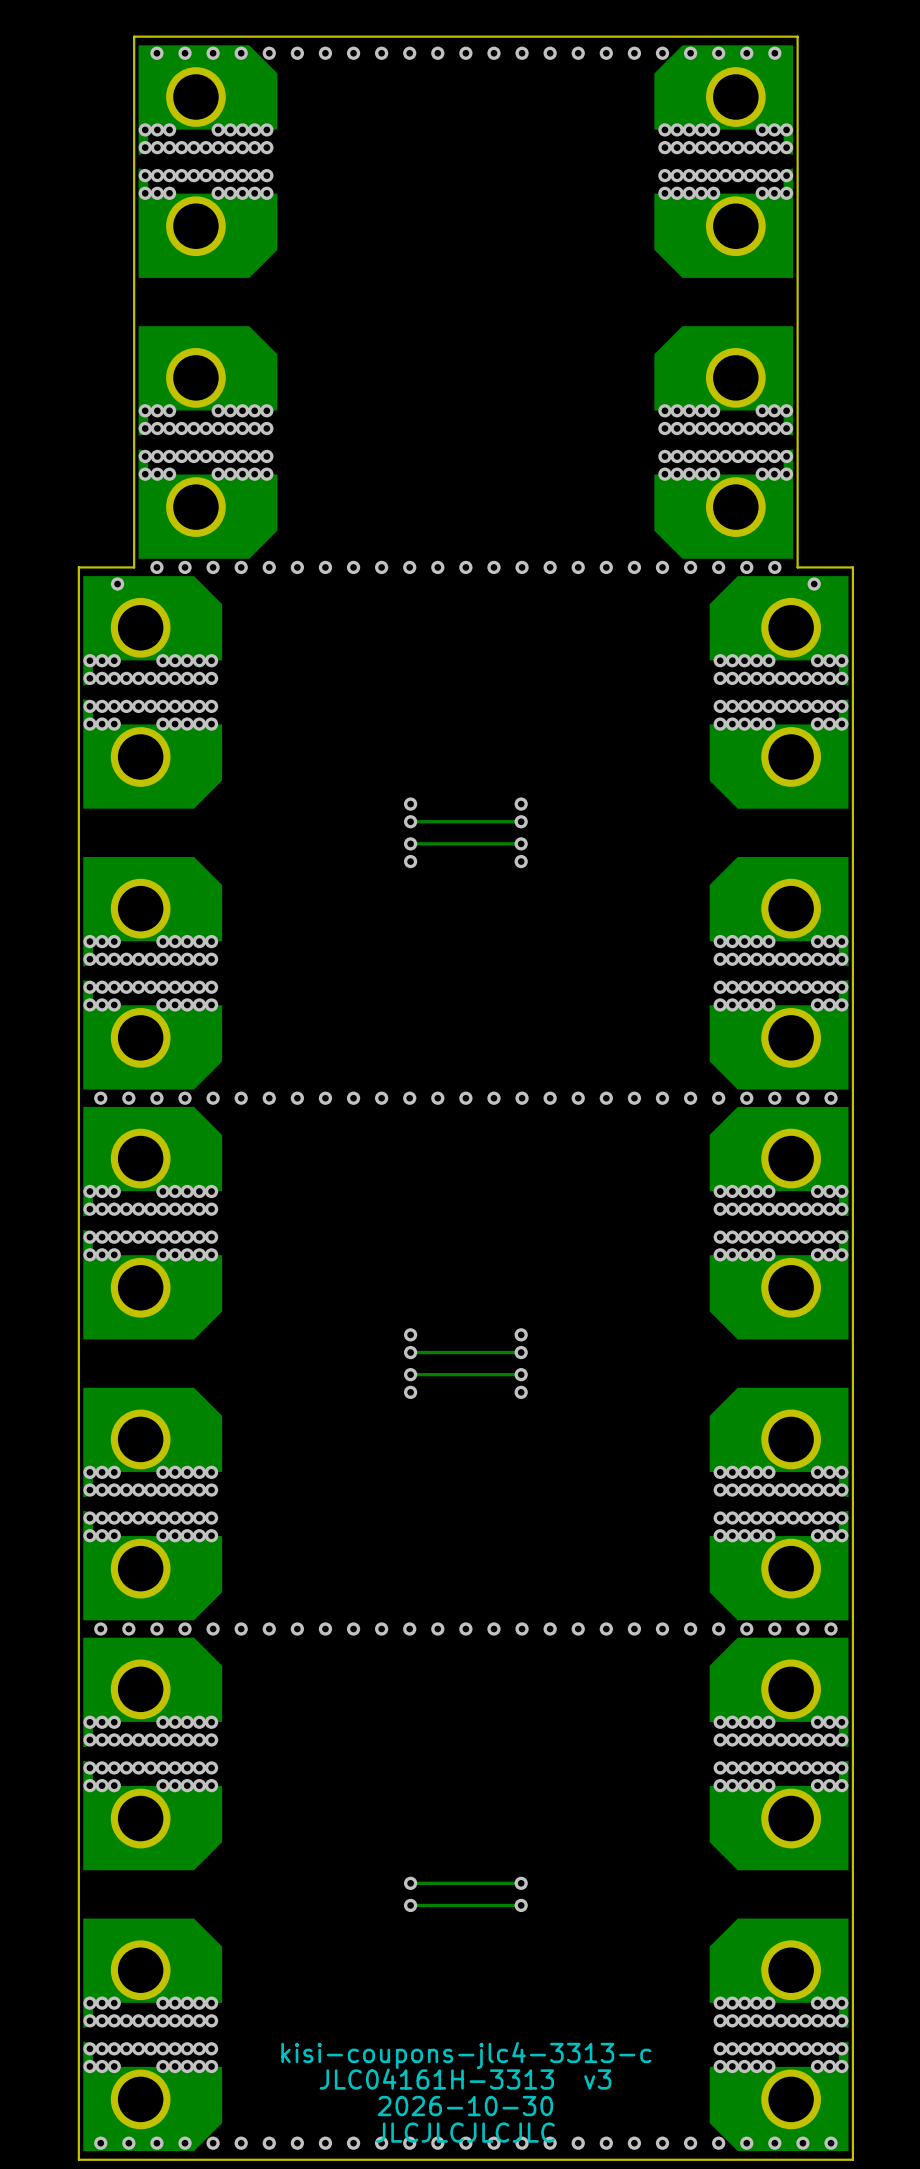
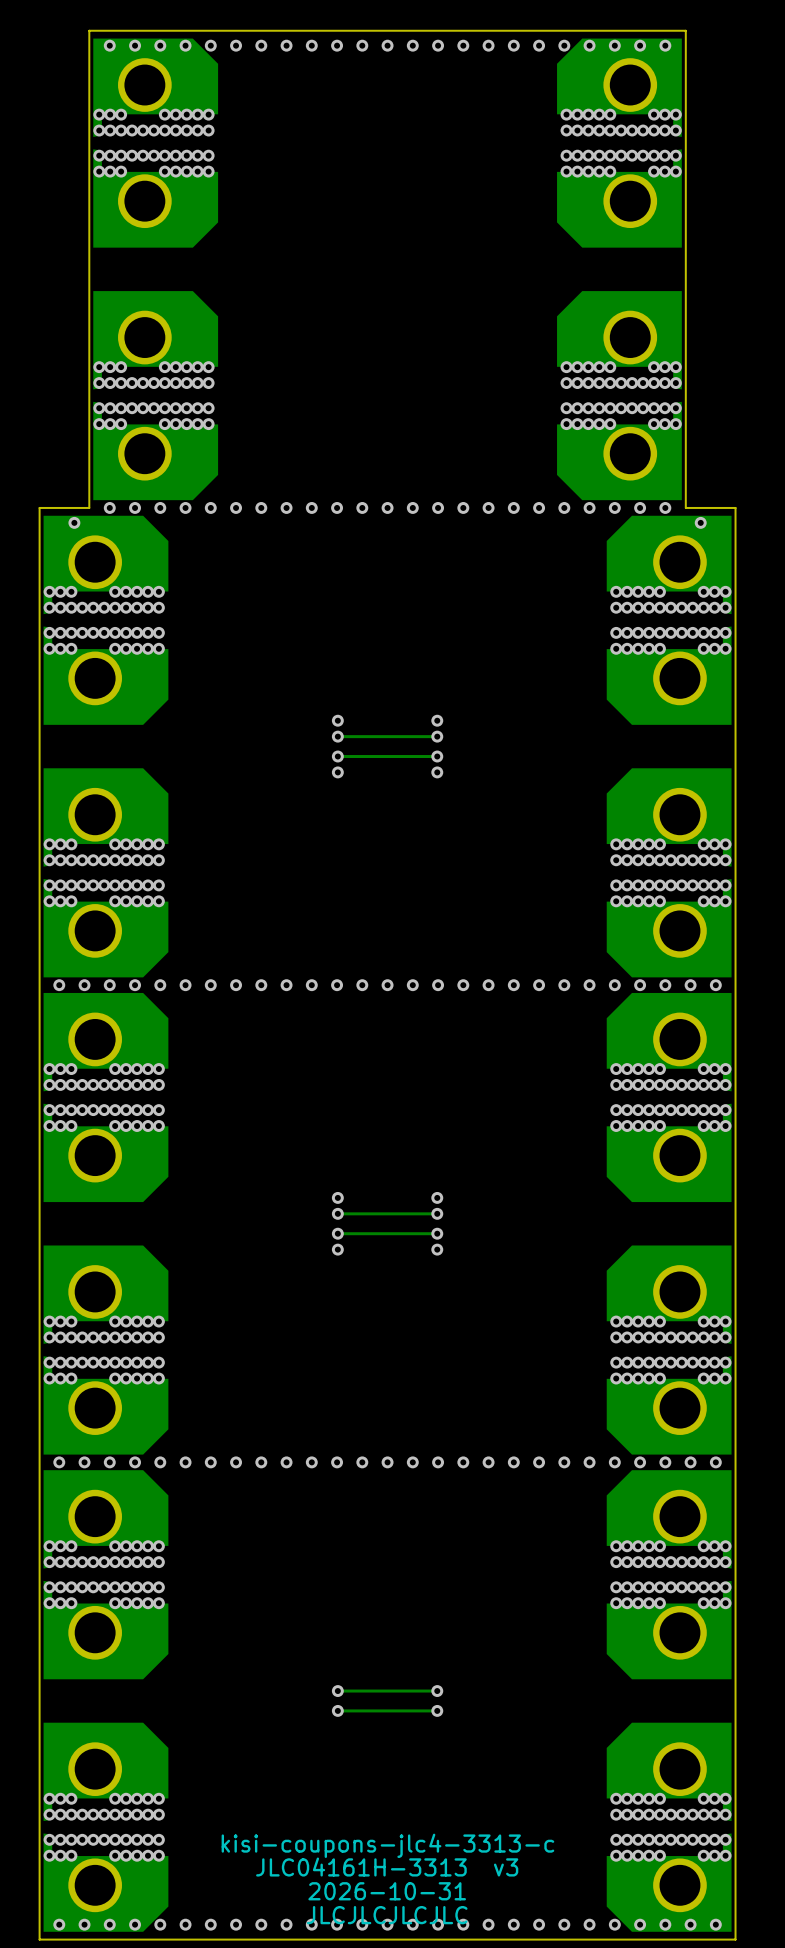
text: 2026-10-30 (465, 2106) -> 2026-10-31 (387, 1891)

